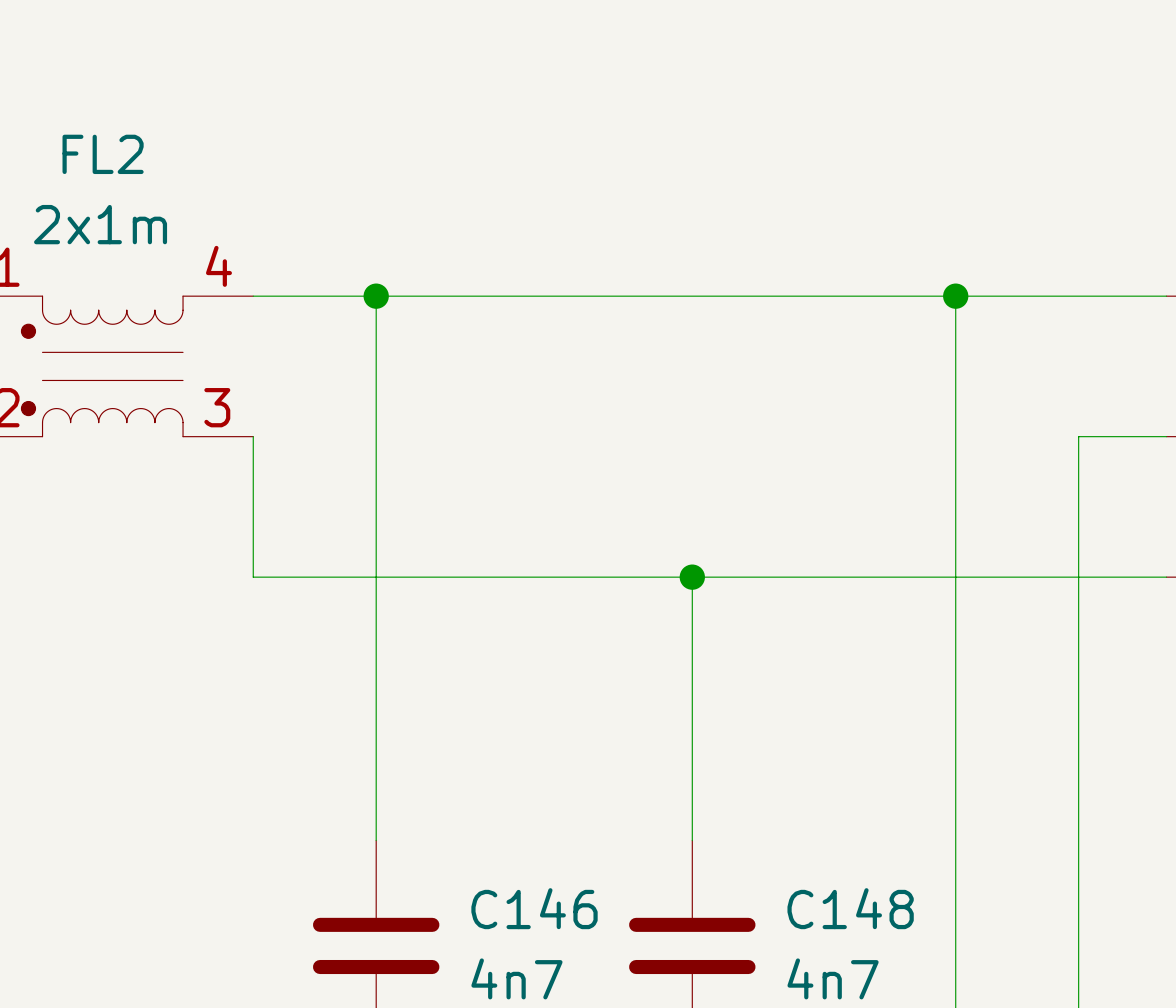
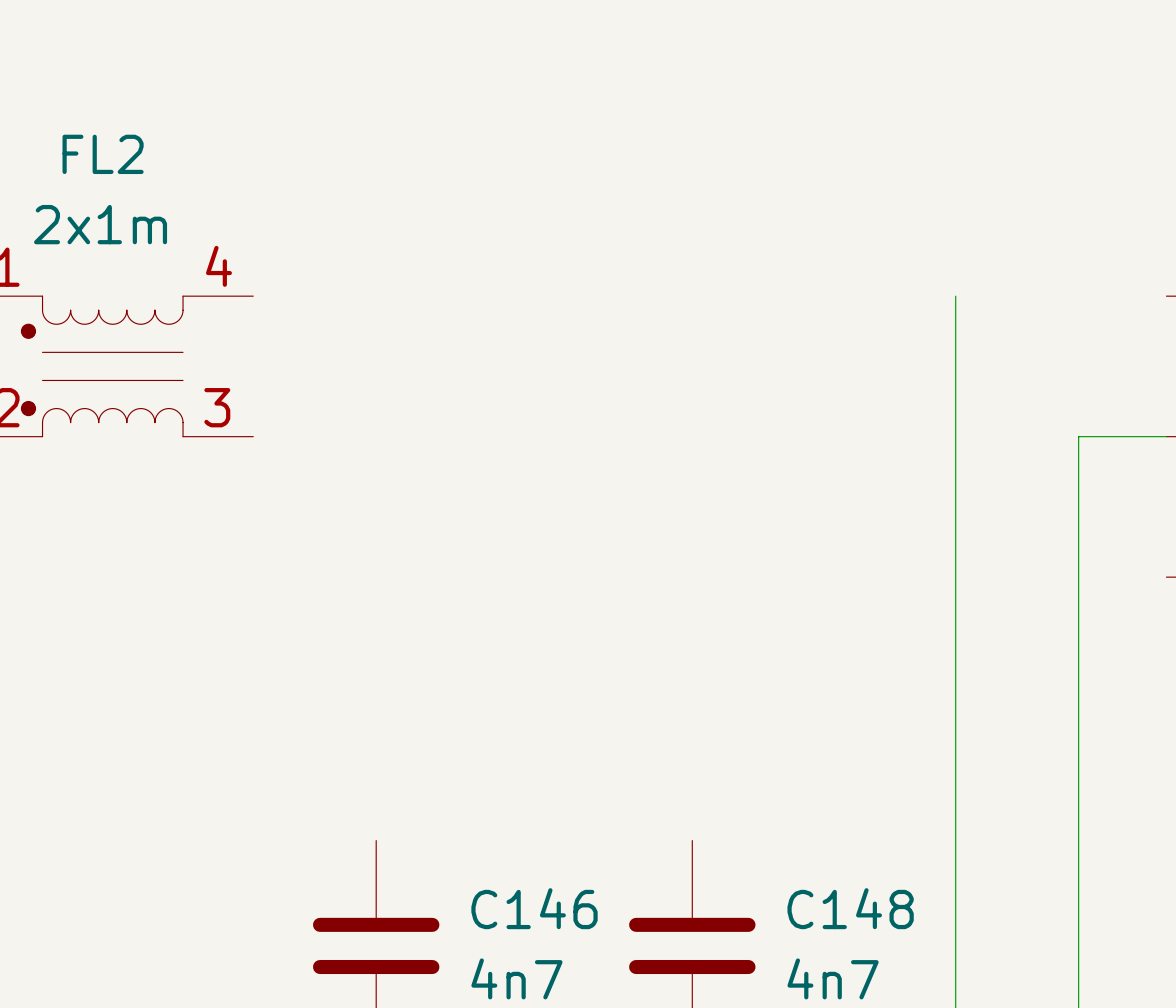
wire: (253, 296) (1166, 296) -> none
wire: (376, 296) (376, 840) -> none
junction: (376, 296) -> none
junction: (955, 296) -> none
wire: (253, 436) (253, 577) (1166, 577) -> none
wire: (692, 577) (692, 840) -> none
junction: (692, 577) -> none

